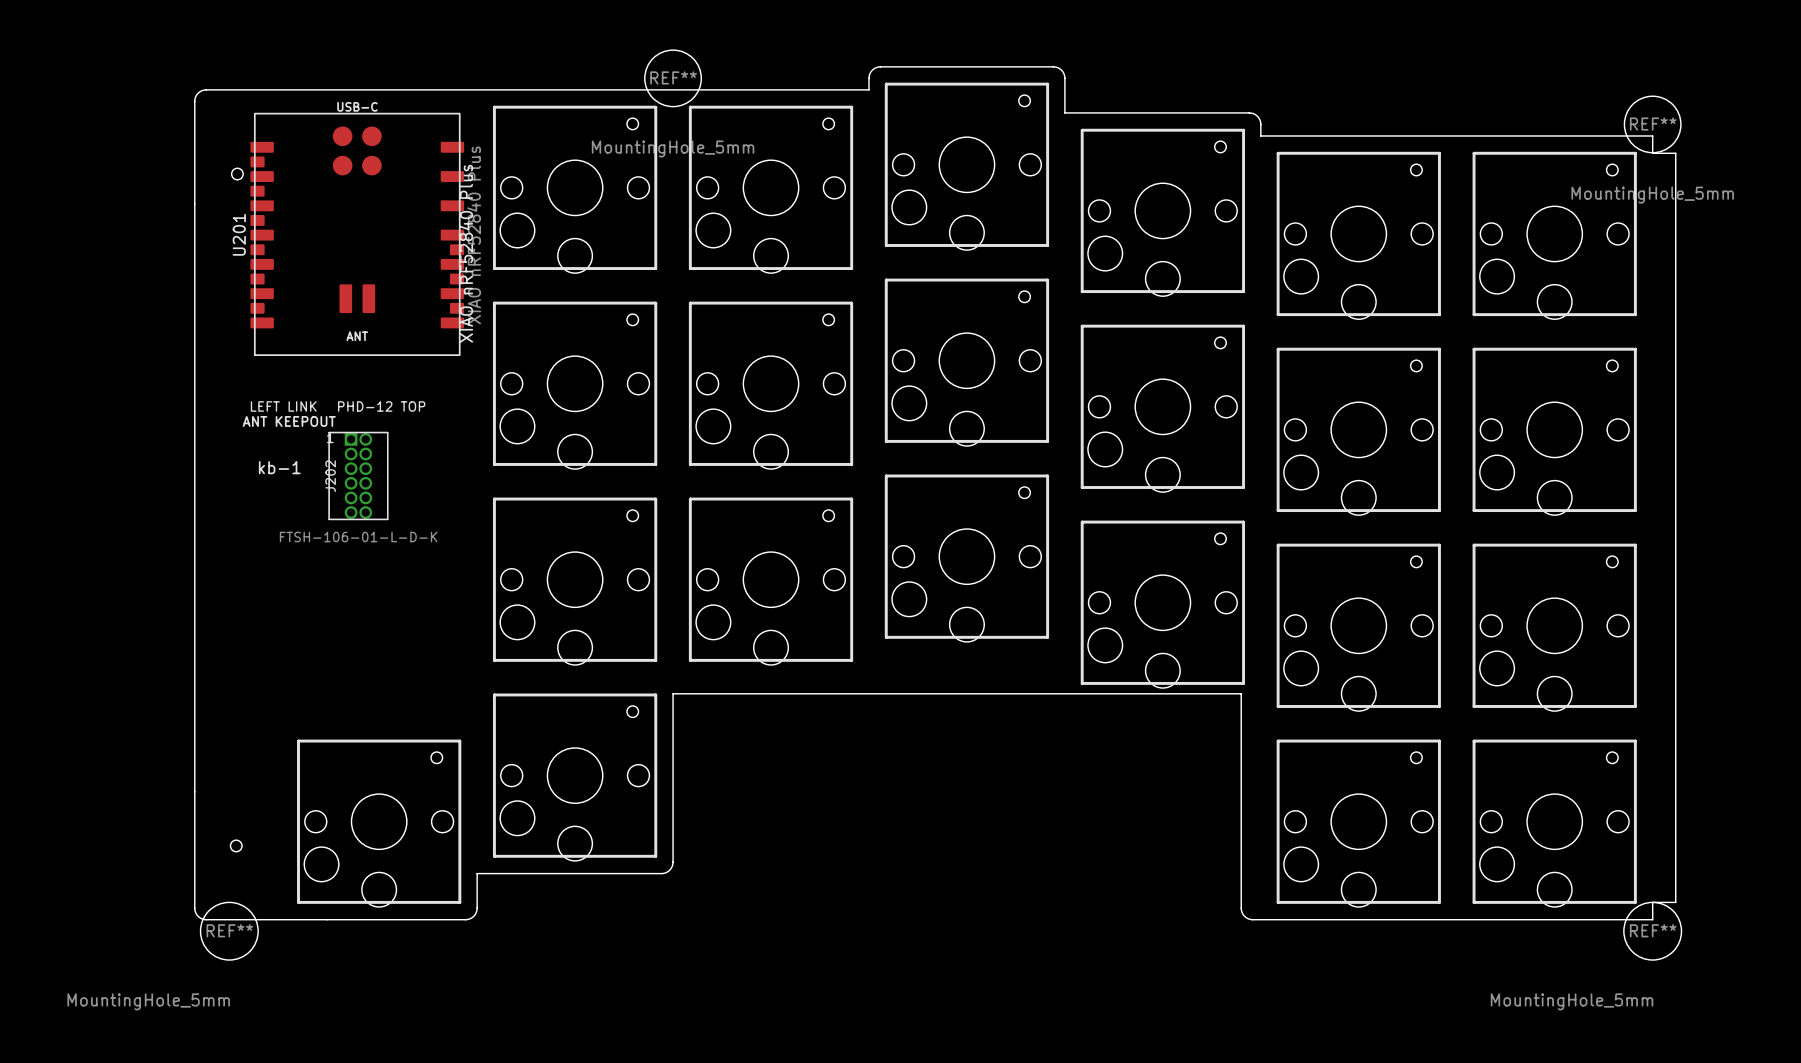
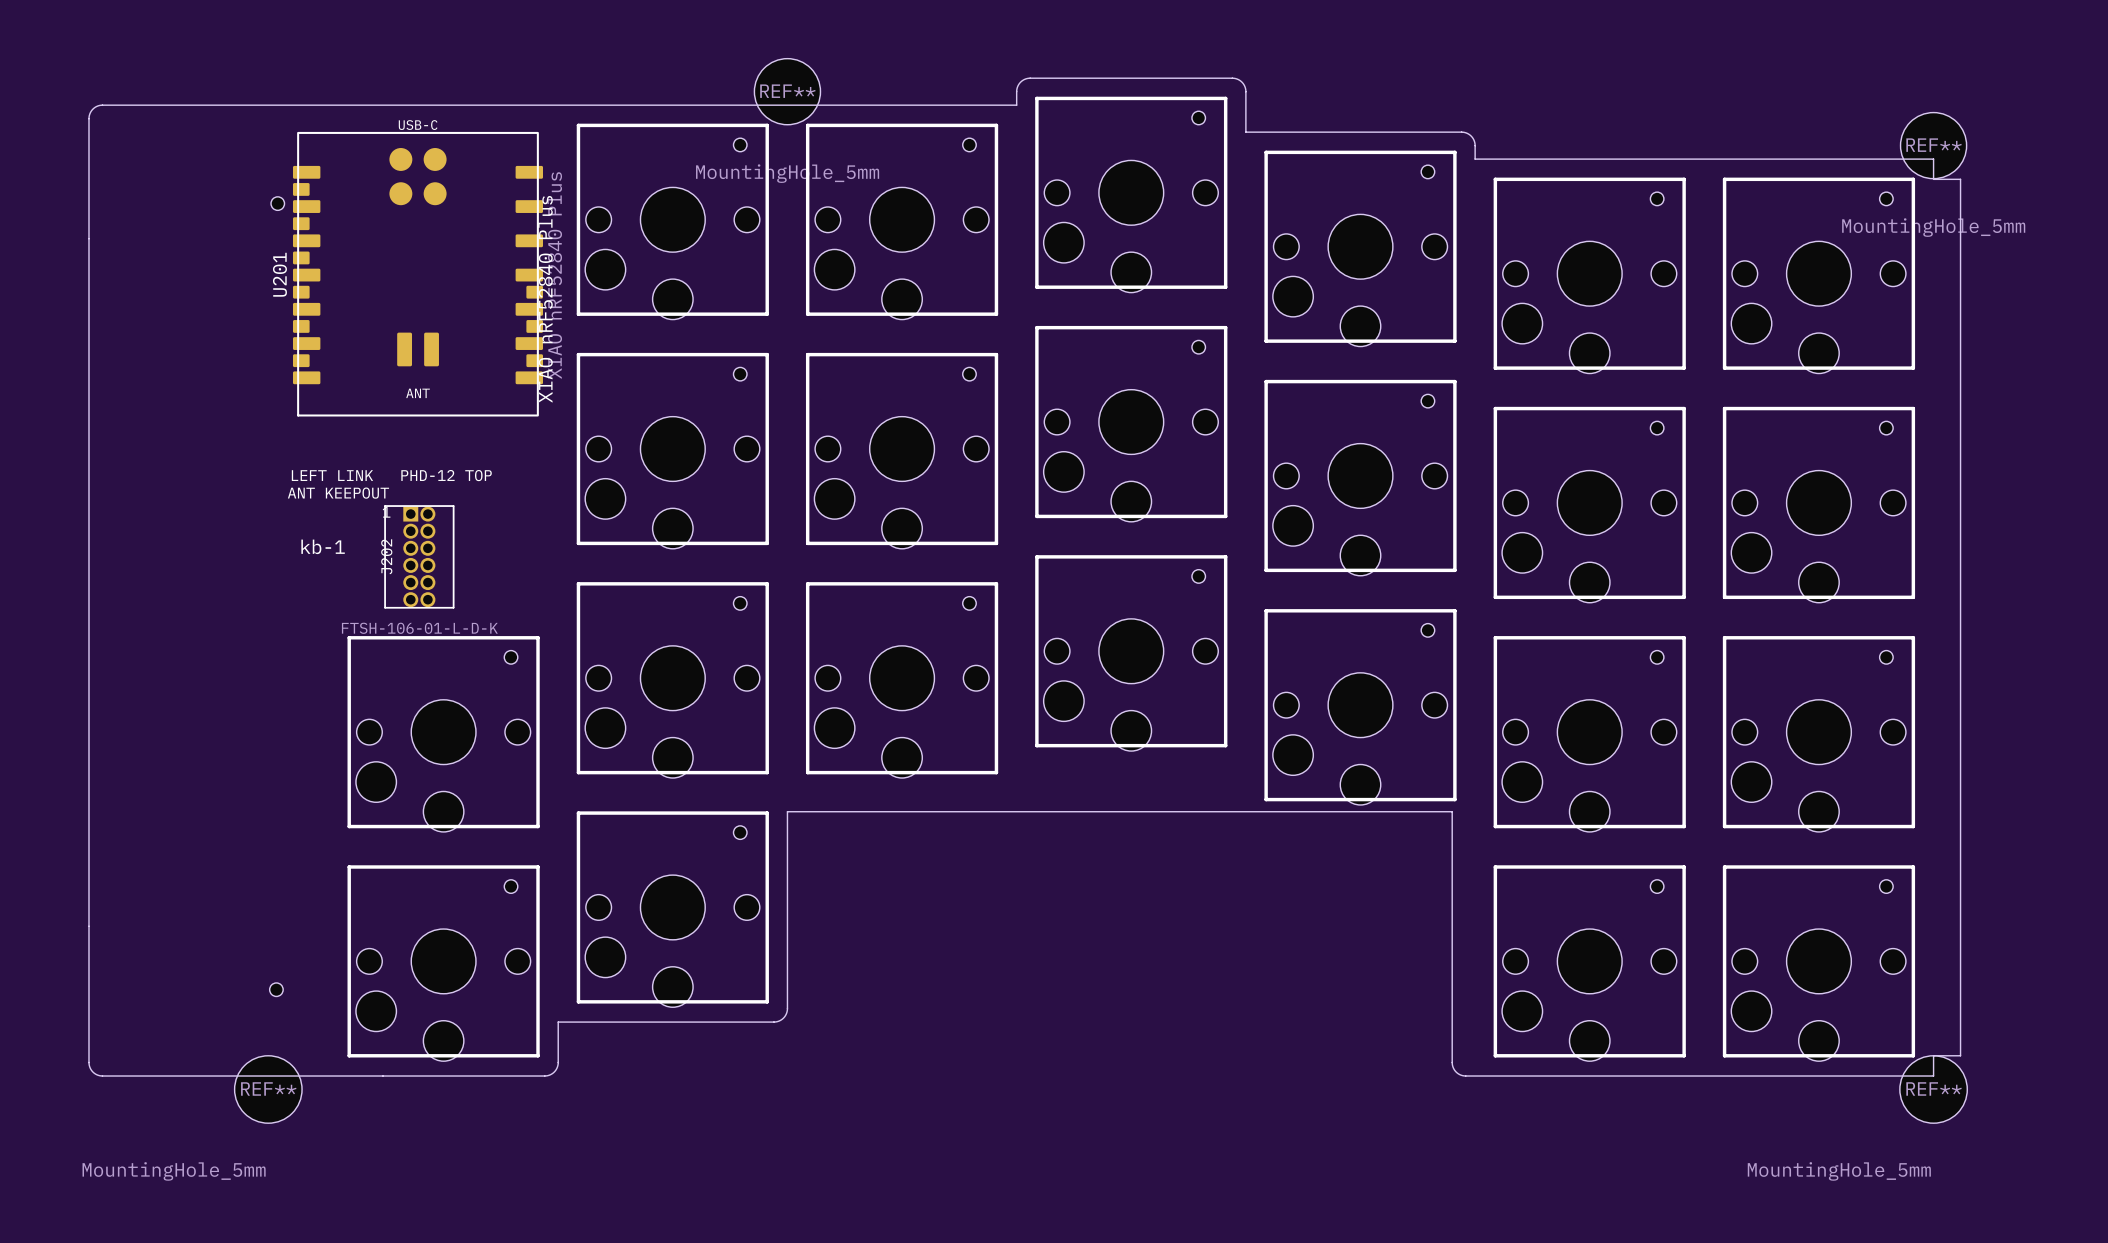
board edge: (206, 89) (198, 93) (194, 101) (194, 908) (198, 916) (206, 919) -> (241, 105) (100, 105) (91, 110) (88, 118) (89, 1064) (92, 1072) (100, 1075) (241, 1076)
part: none -> (443, 734)

